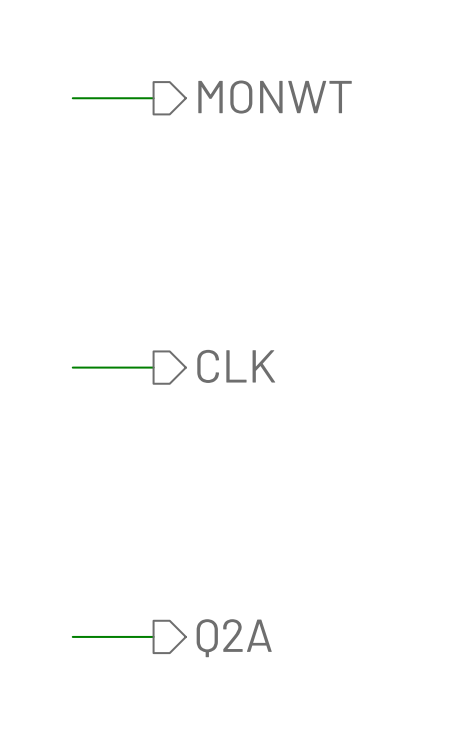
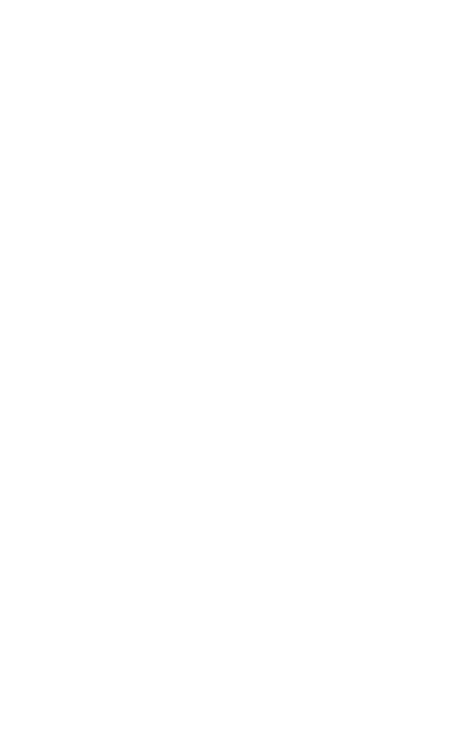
hierarchical label: MONWT (275, 97) -> none
wire: (72, 98) (153, 98) -> none
hierarchical label: CLK (236, 366) -> none
wire: (72, 367) (153, 367) -> none
wire: (72, 636) (153, 636) -> none
hierarchical label: Q2A (234, 638) -> none

